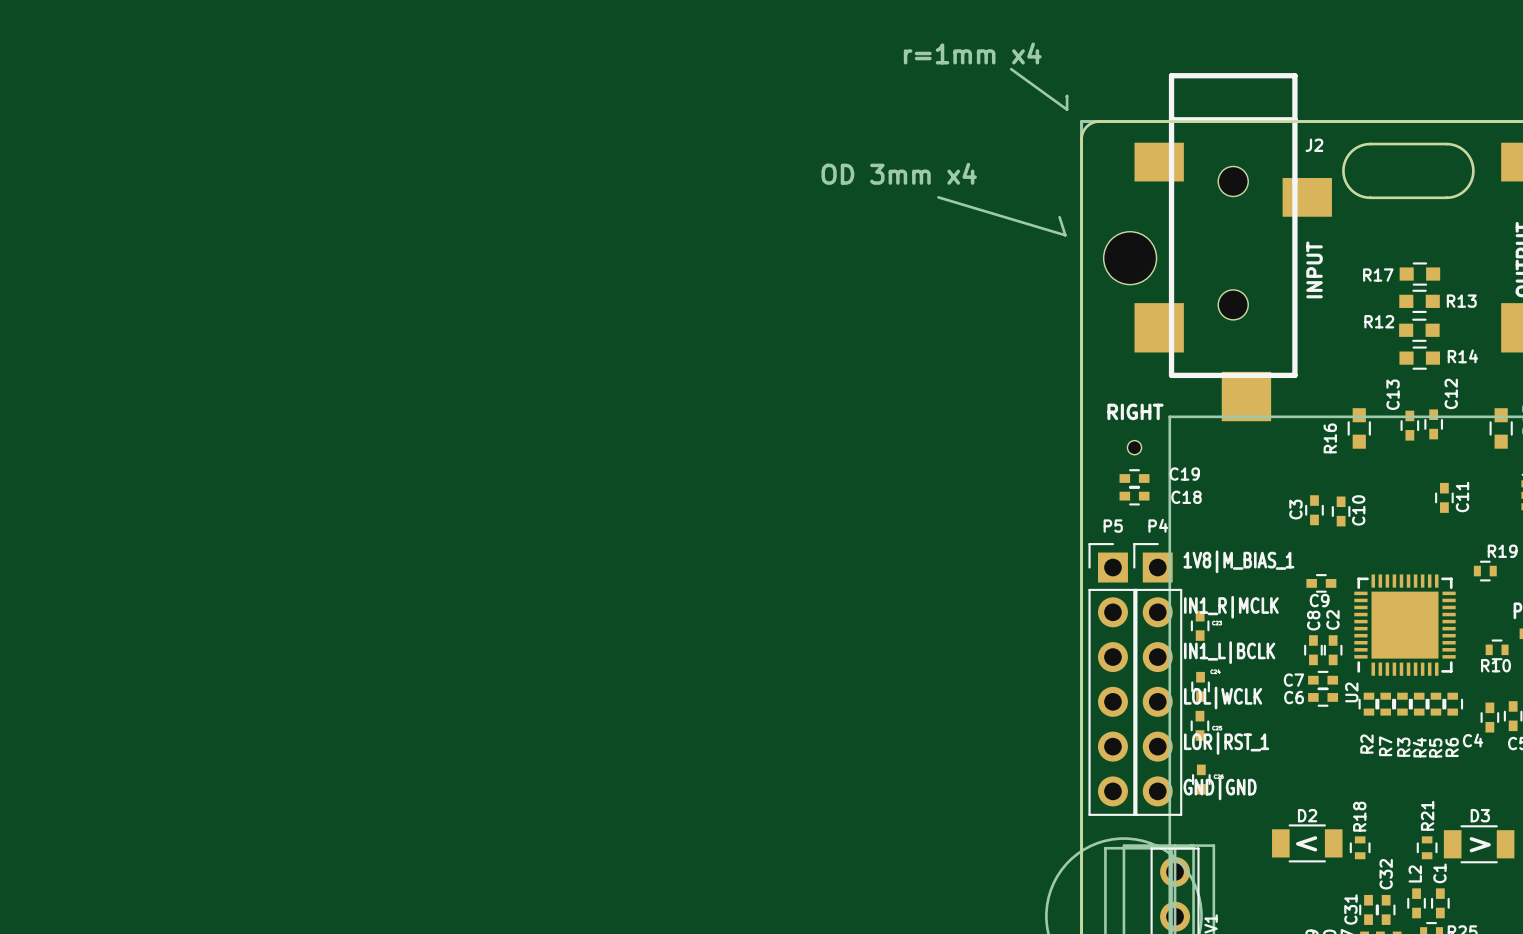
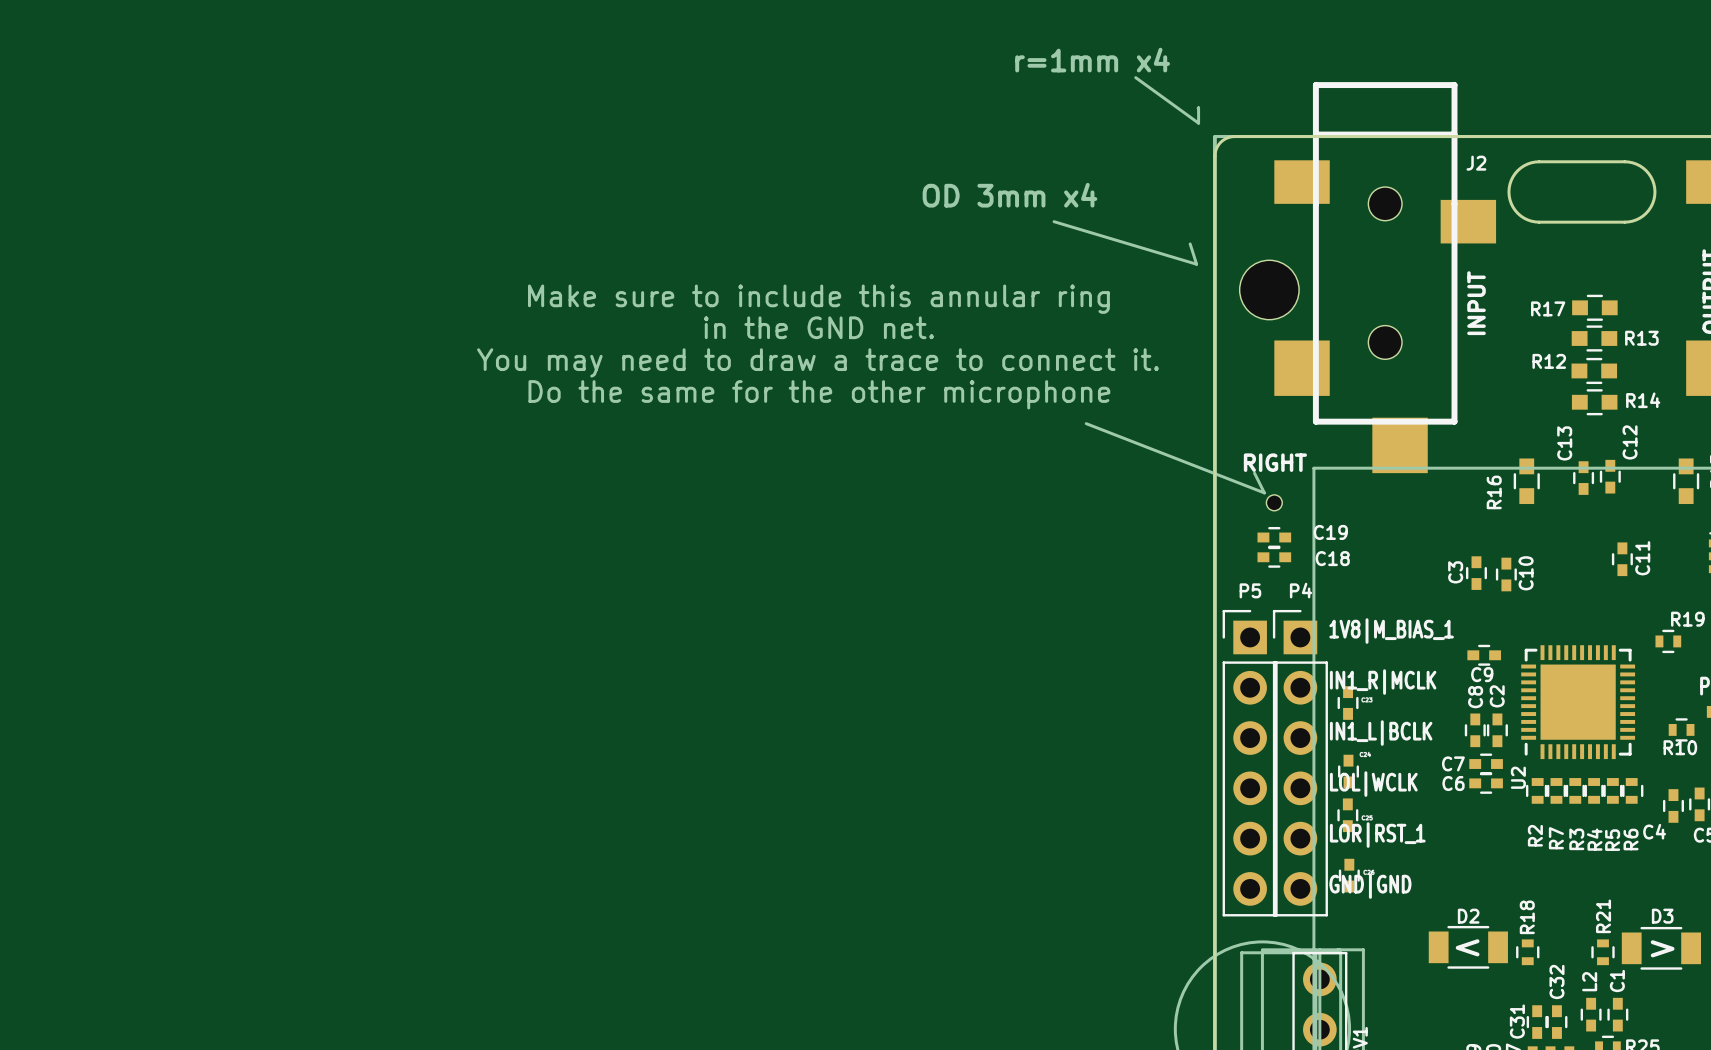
text: none -> Make sure to include this annular ring (818, 299)
text: none -> in the GND net. (818, 327)
text: none -> You may need to draw a trace to connect it. (817, 362)
text: none -> Do the same for the other microphone (819, 394)
line: none -> (1086, 423) (1264, 492) (1254, 473)

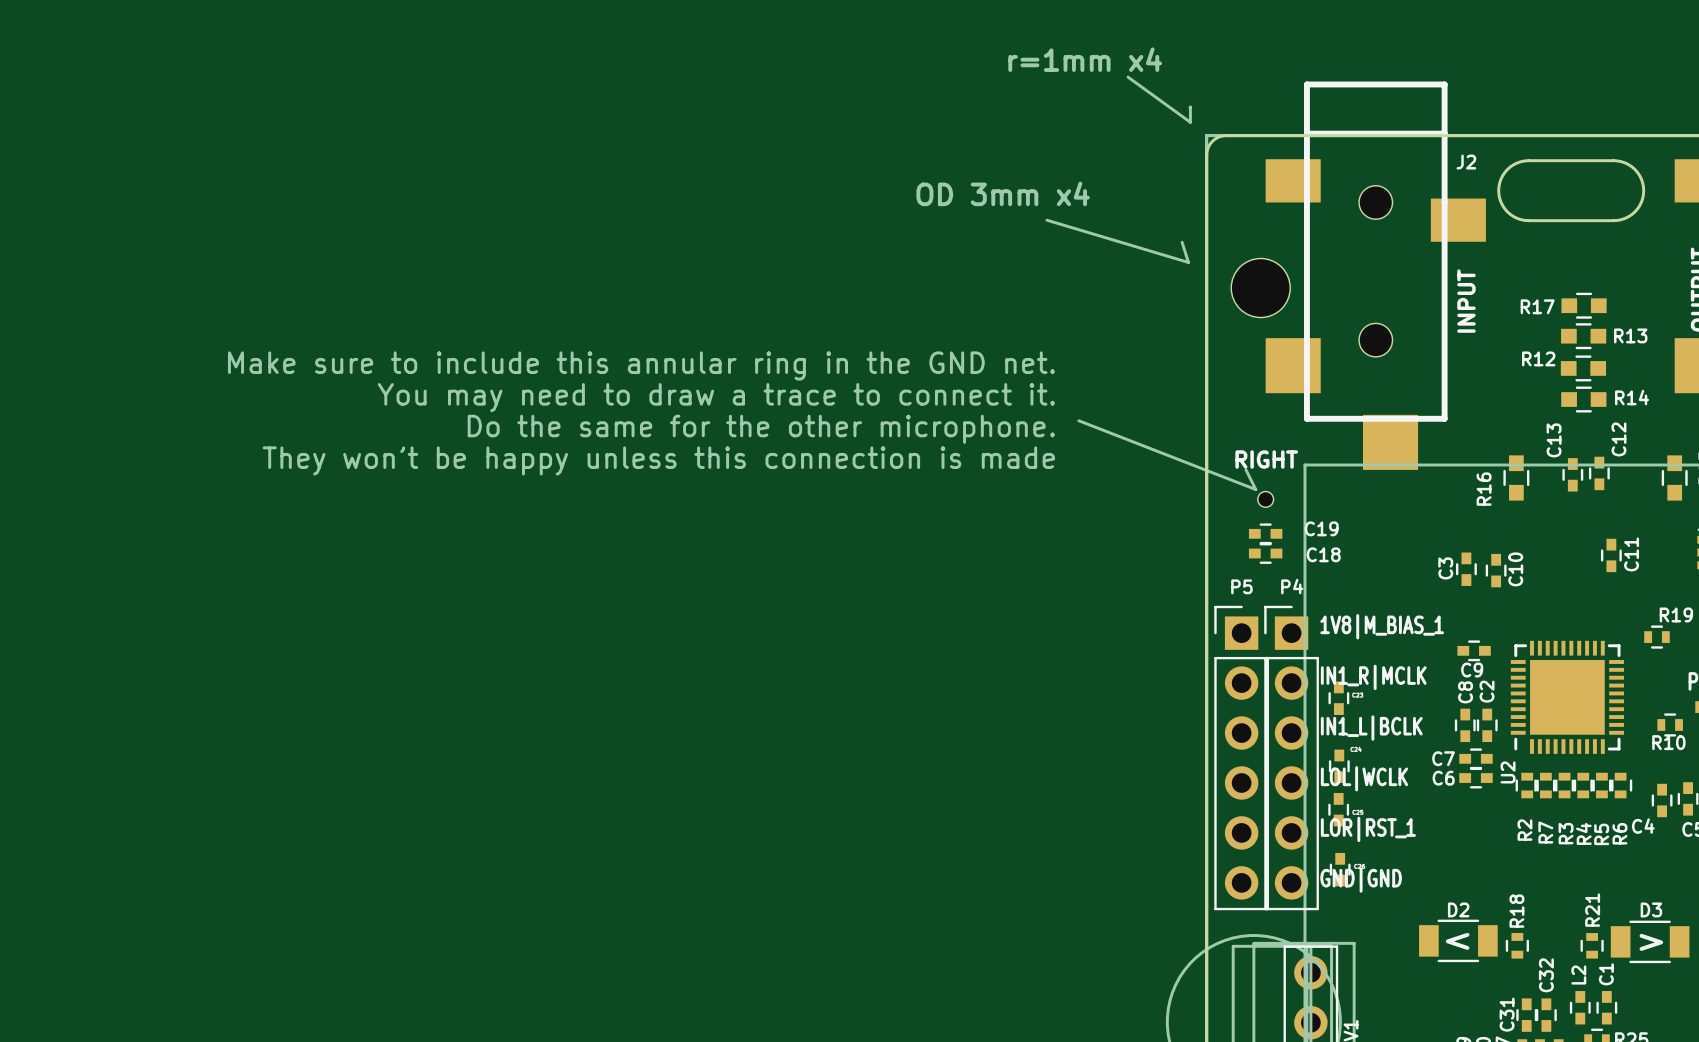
text: Make sure to include this annular ring (818, 299) -> none
text: in the GND net. (818, 327) -> none
text position: You may need to draw a trace to connect it. (817, 362) -> You may need to draw a trace to connect it. (716, 397)
text: none -> Make sure to include this annular ring in the GND net. (641, 365)
text: Do the same for the other microphone (819, 394) -> Do the same for the other microphone. (761, 429)
text: none -> They won’t be happy unless this connection is made (658, 460)

